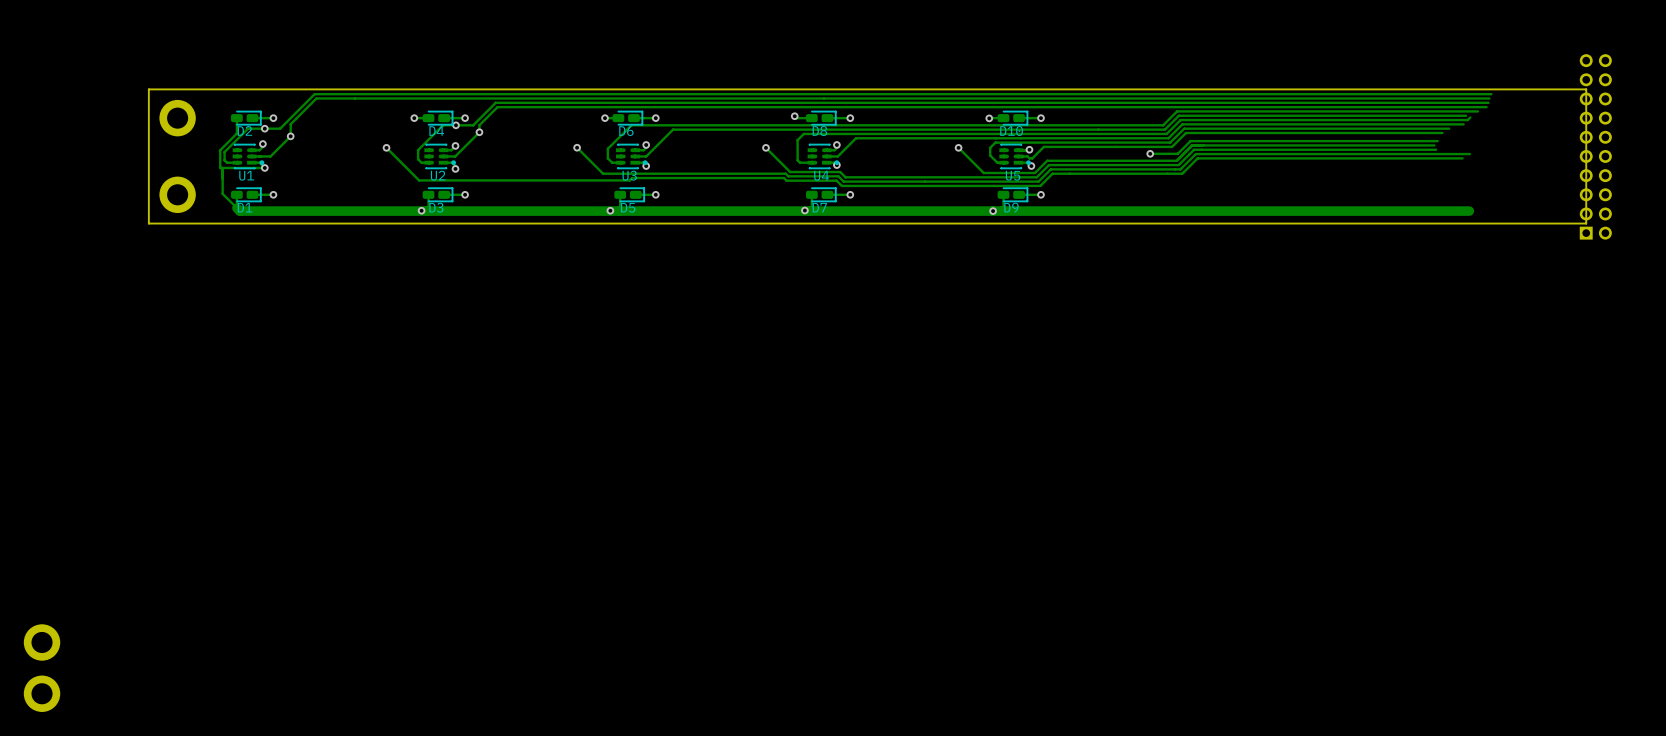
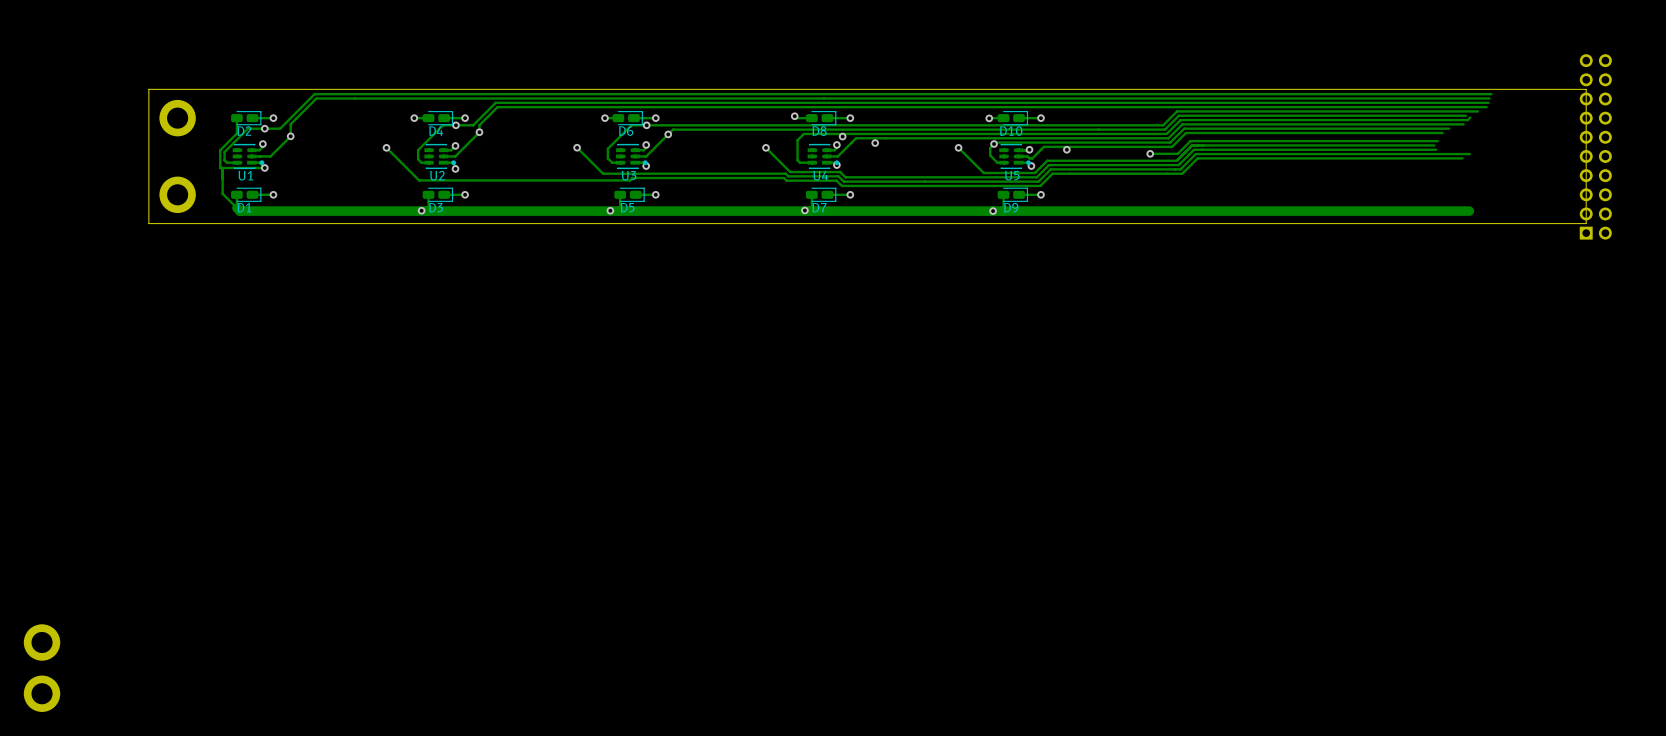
via: none -> (646, 125)
via: none -> (668, 134)
via: none -> (842, 136)
via: none -> (875, 143)
via: none -> (994, 144)
via: none -> (1066, 149)

